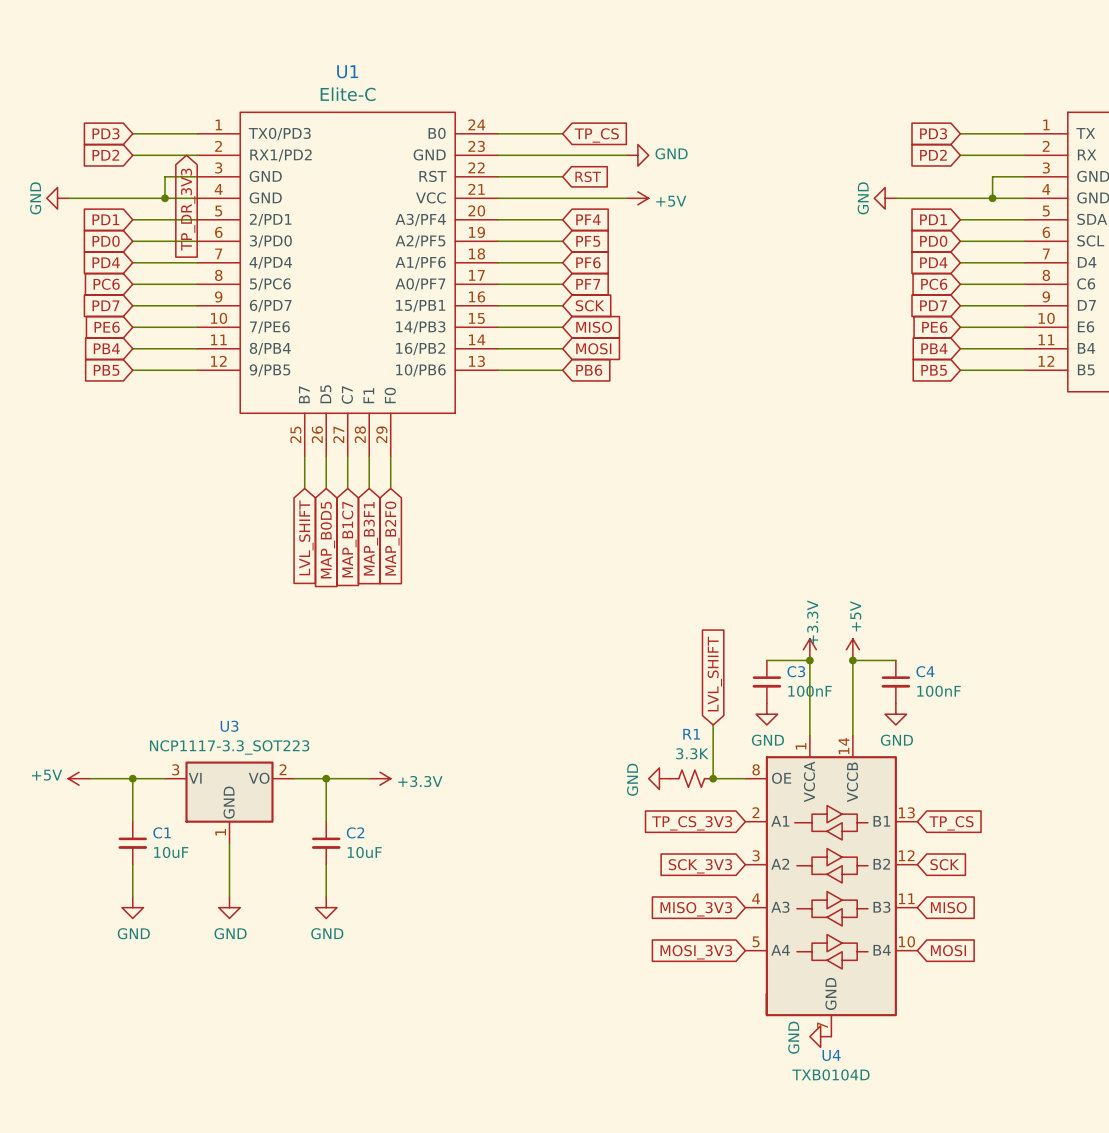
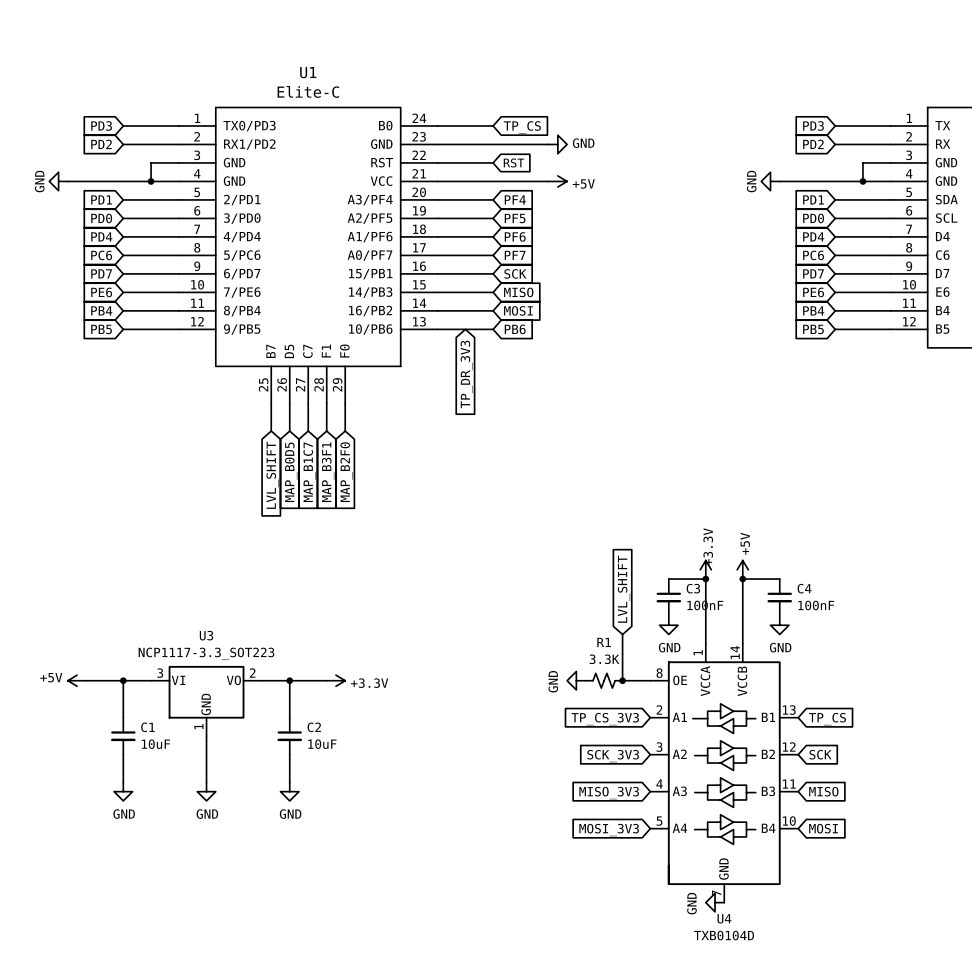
global label: TP_DR_3V3 (188, 209) -> none
global label: none -> TP_DR_3V3 (466, 374)

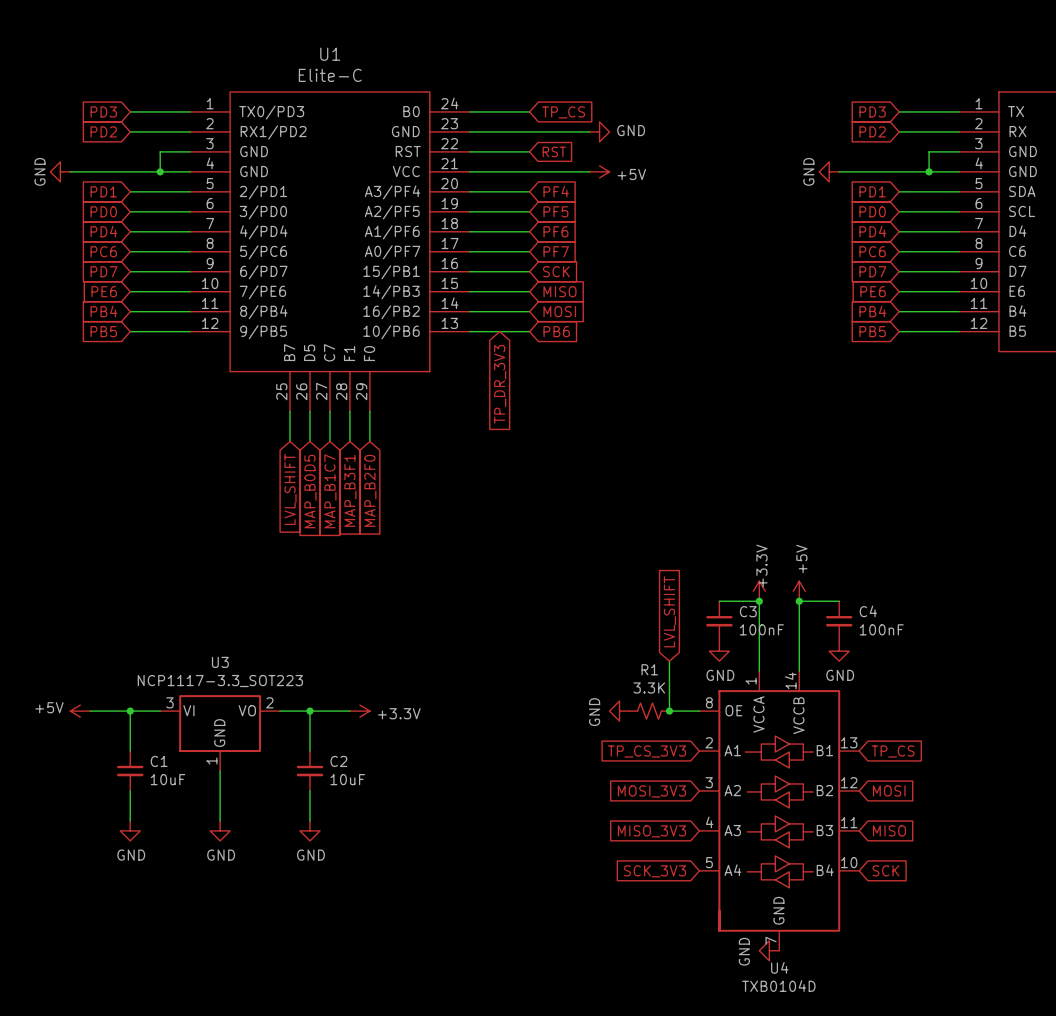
global label: SCK (820, 754) -> MOSI (889, 790)
global label: SCK_3V3 (613, 756) -> MOSI_3V3 (651, 791)
global label: MOSI (823, 828) -> SCK (885, 870)
global label: MOSI_3V3 (609, 830) -> SCK_3V3 (655, 871)

